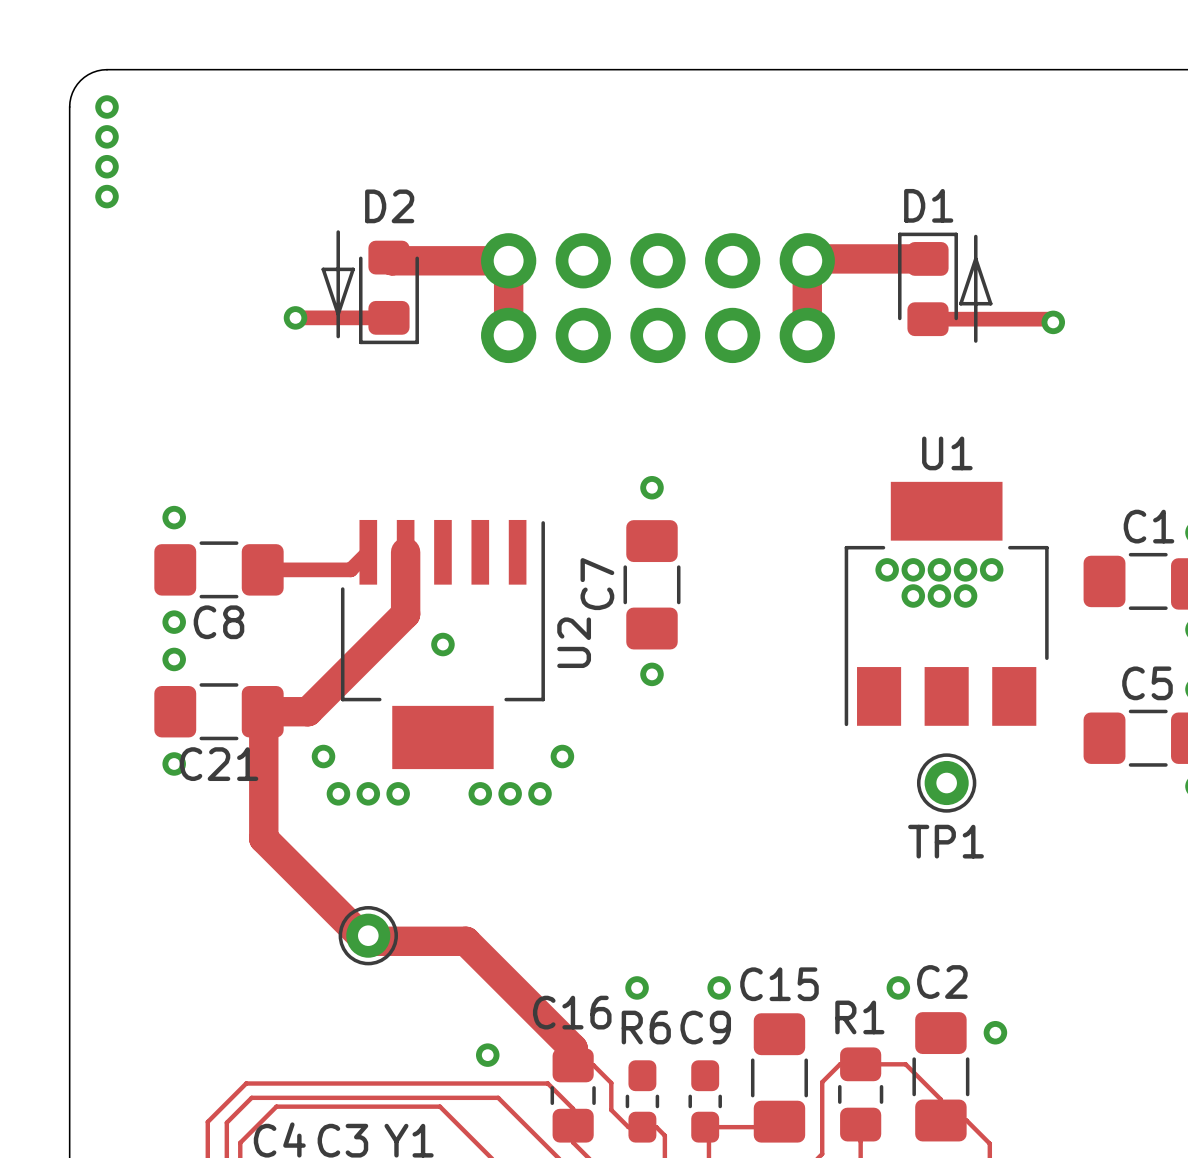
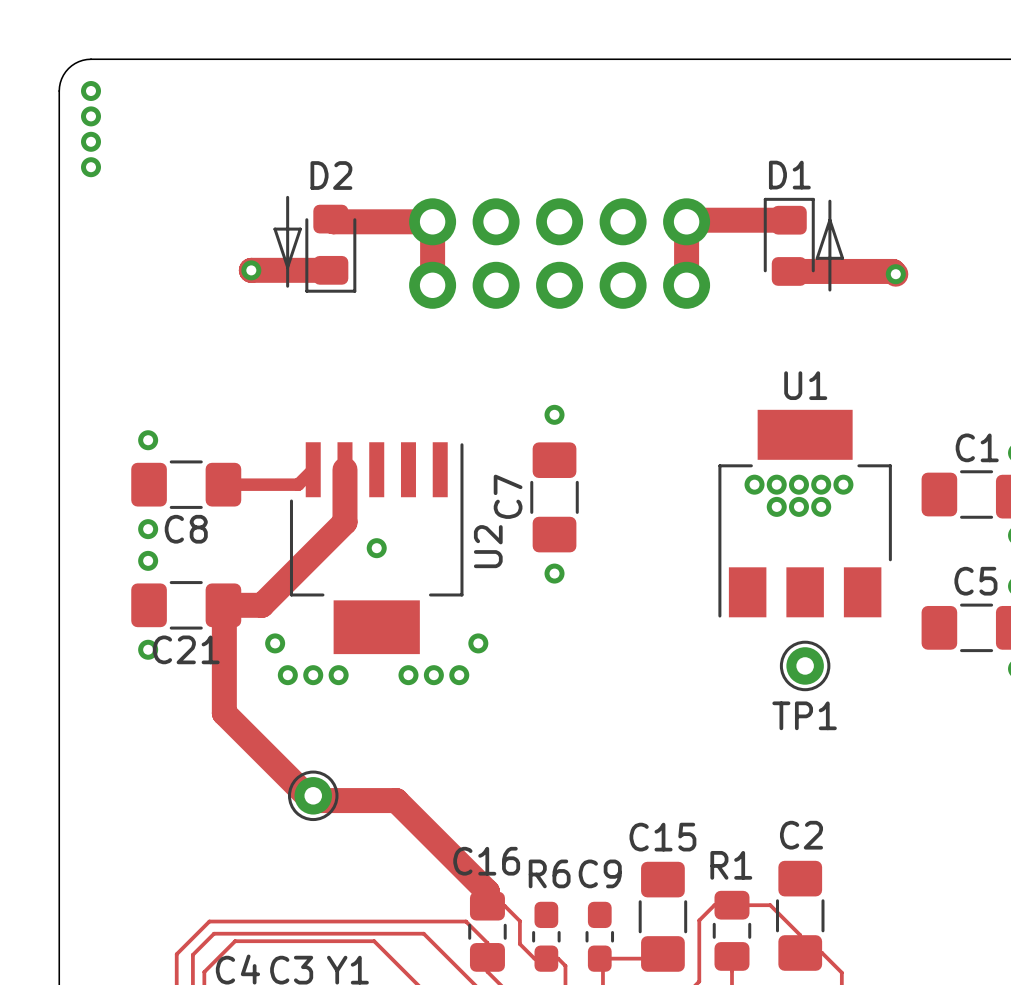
track width: thin (295, 317) (388, 317) -> thick (251, 270) (330, 270)
track width: thin (928, 319) (1050, 319) (1053, 322) -> thick (789, 271) (893, 271) (895, 274)
via: (637, 987) -> none
via: (719, 987) -> none
via: (898, 987) -> none
via: (995, 1032) -> none
via: (487, 1055) -> none

